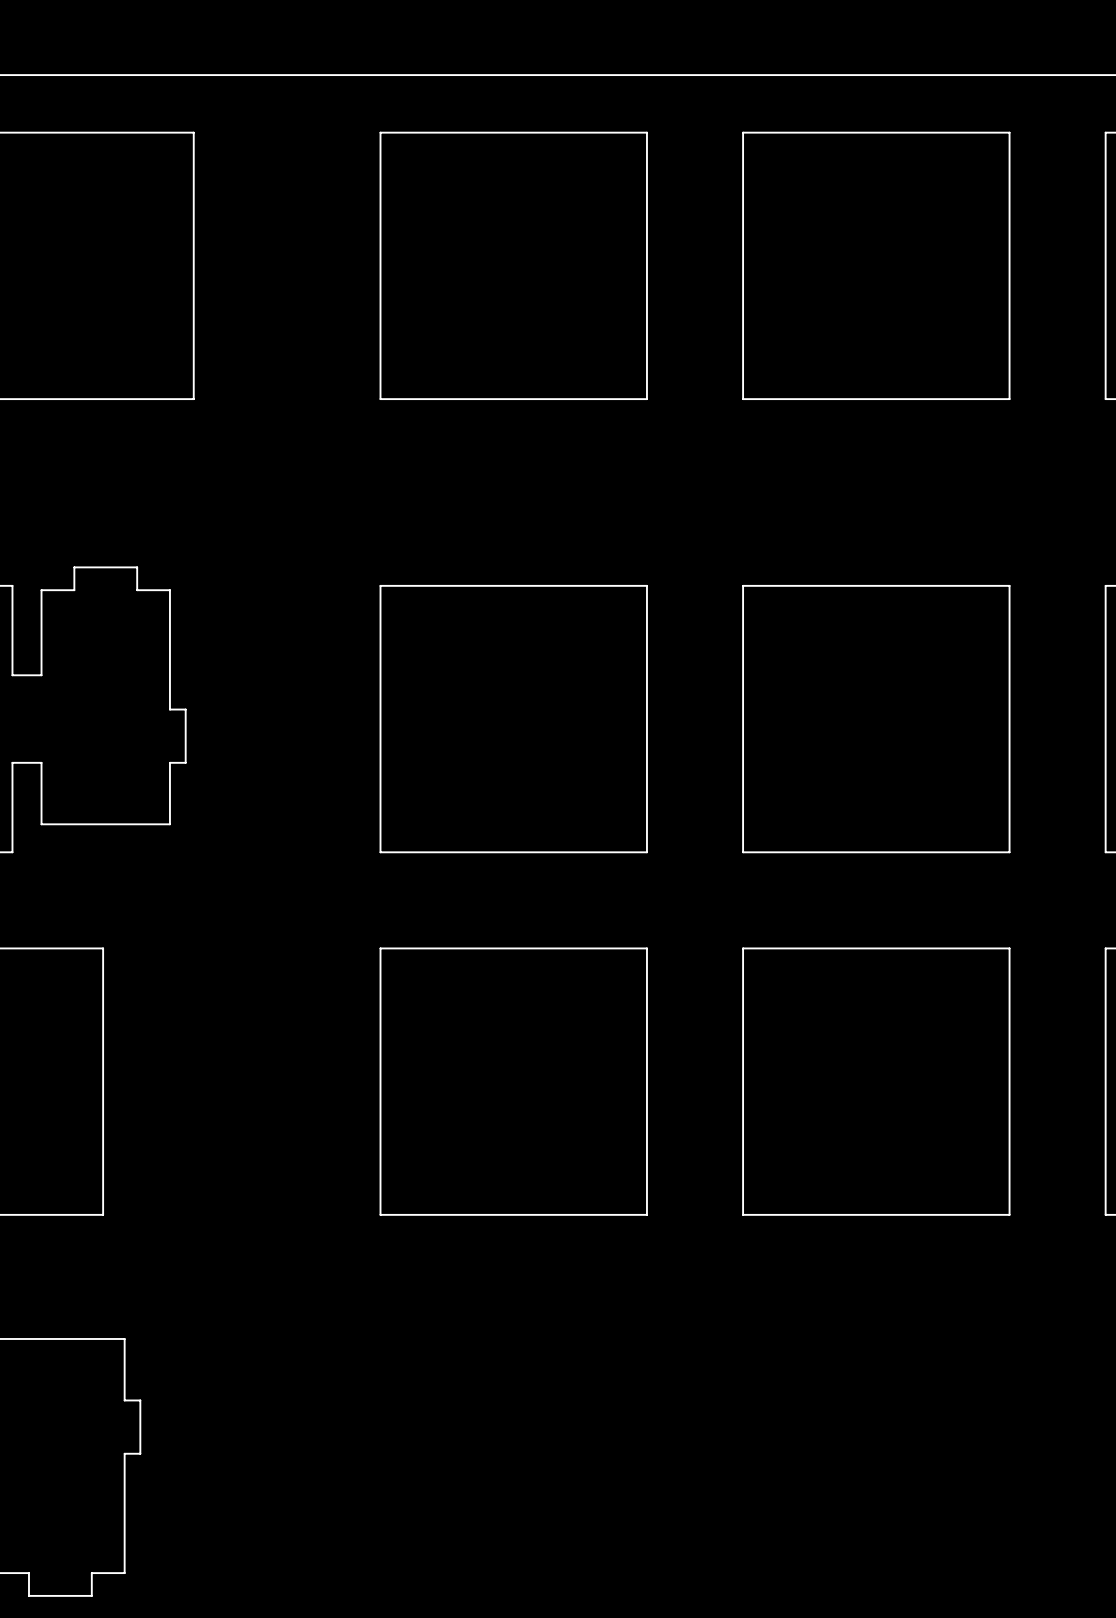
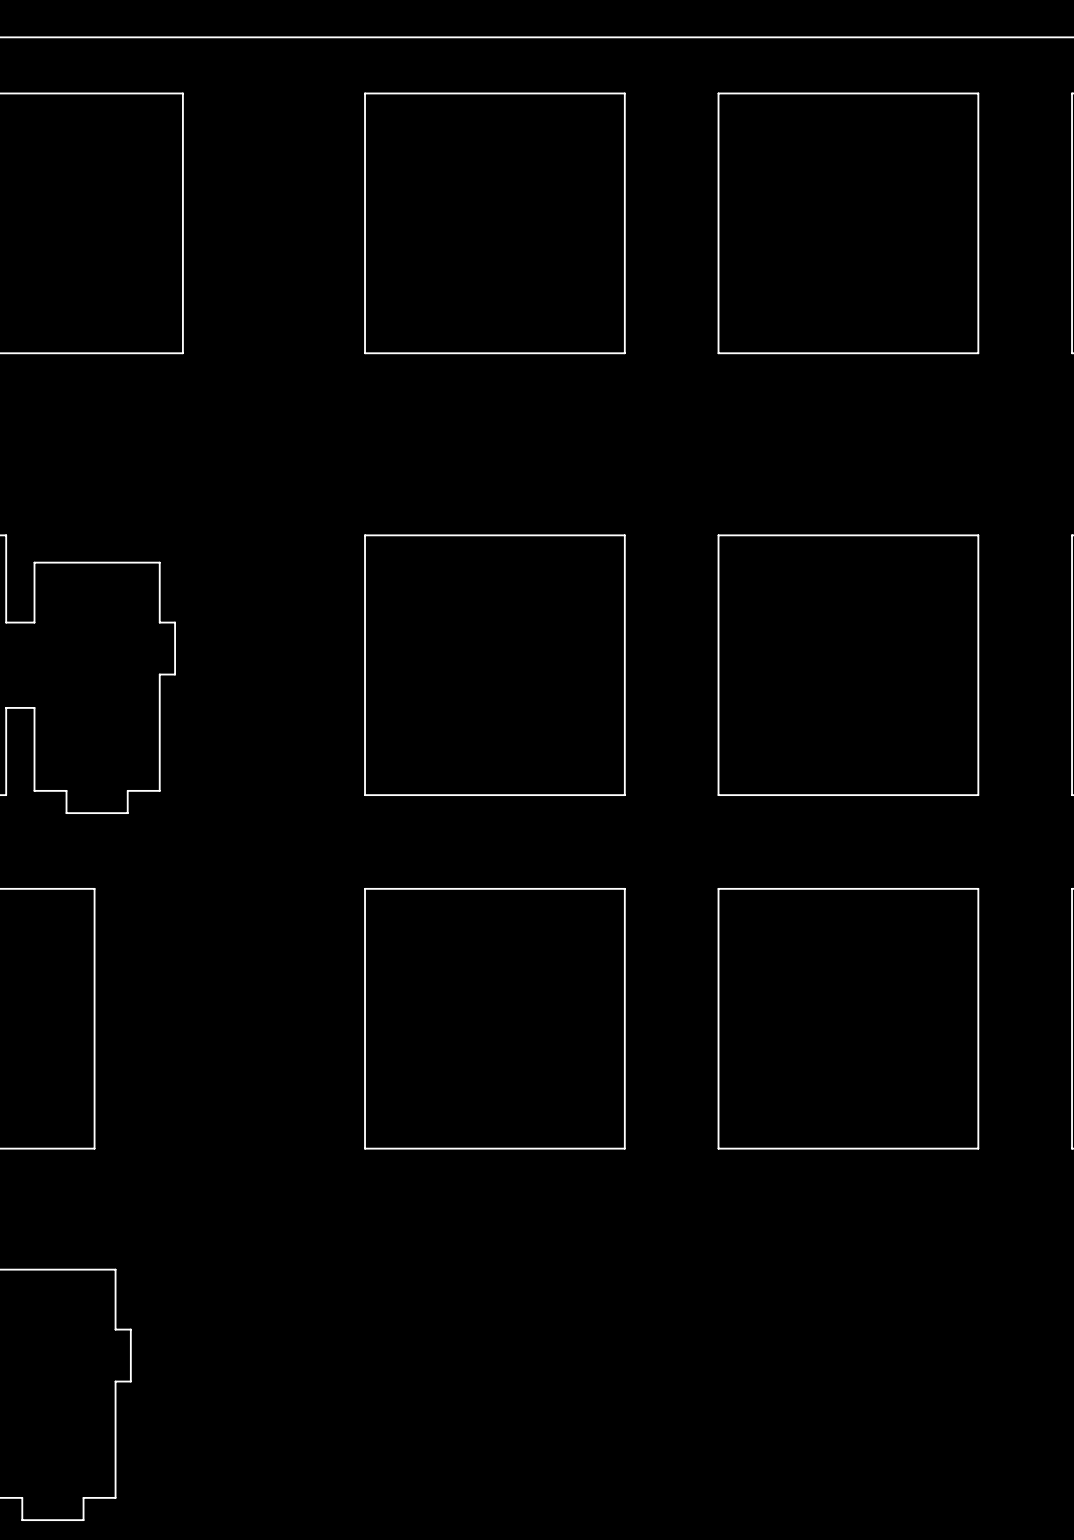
board edge: (41, 613) (41, 590) (74, 590) (74, 567) (137, 567) (137, 590) (169, 590) (169, 709) (185, 709) -> (34, 562) (159, 562) (159, 622) (175, 622) (175, 655)
board edge: (185, 728) (185, 762) (169, 762) (169, 824) (41, 824) -> (175, 674) (159, 674) (159, 790) (127, 790) (127, 813) (66, 813) (66, 790) (34, 790) (34, 767)

